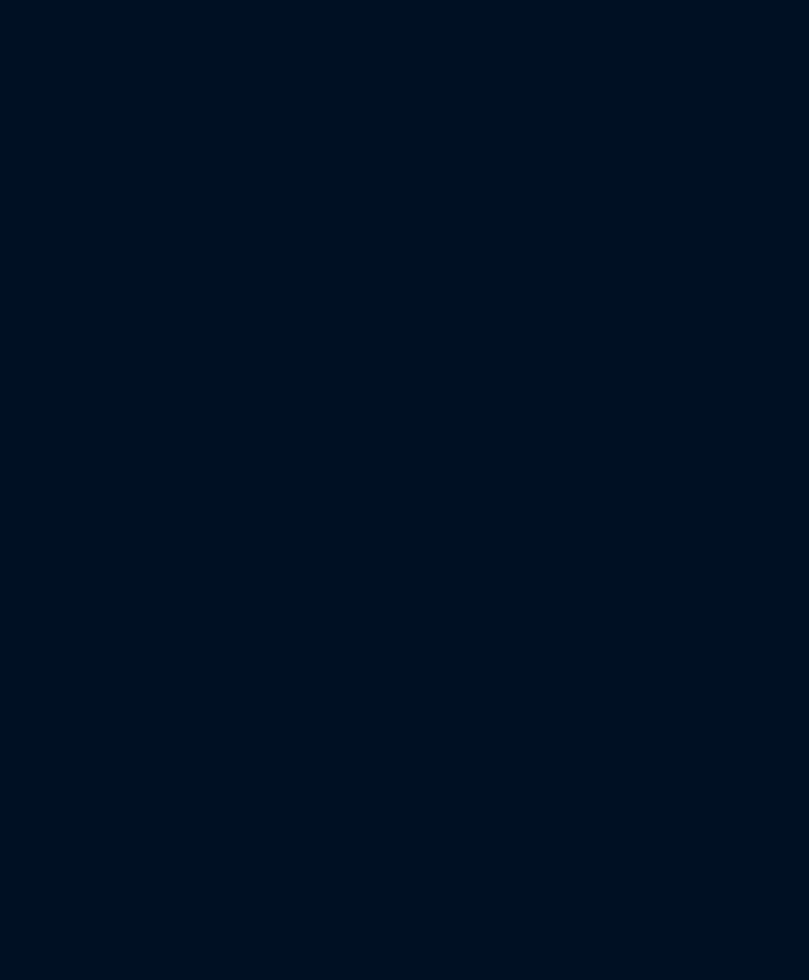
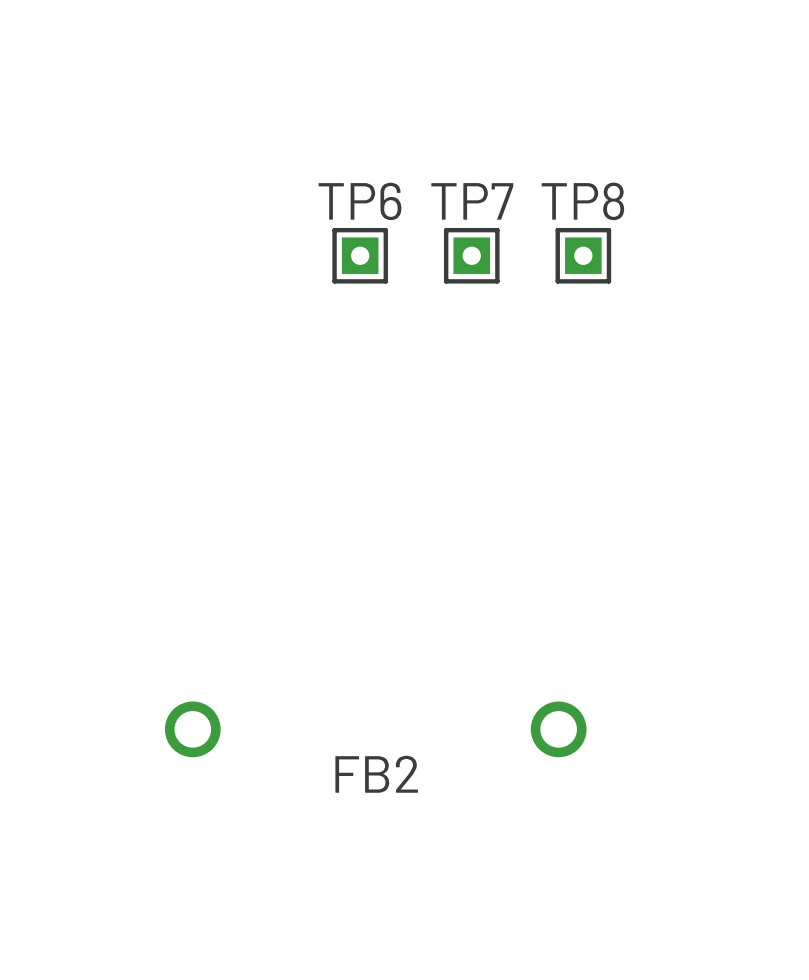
TP6: none -> (360, 255)
TP7: none -> (471, 255)
TP8: none -> (583, 255)
FB2: none -> (375, 729)

